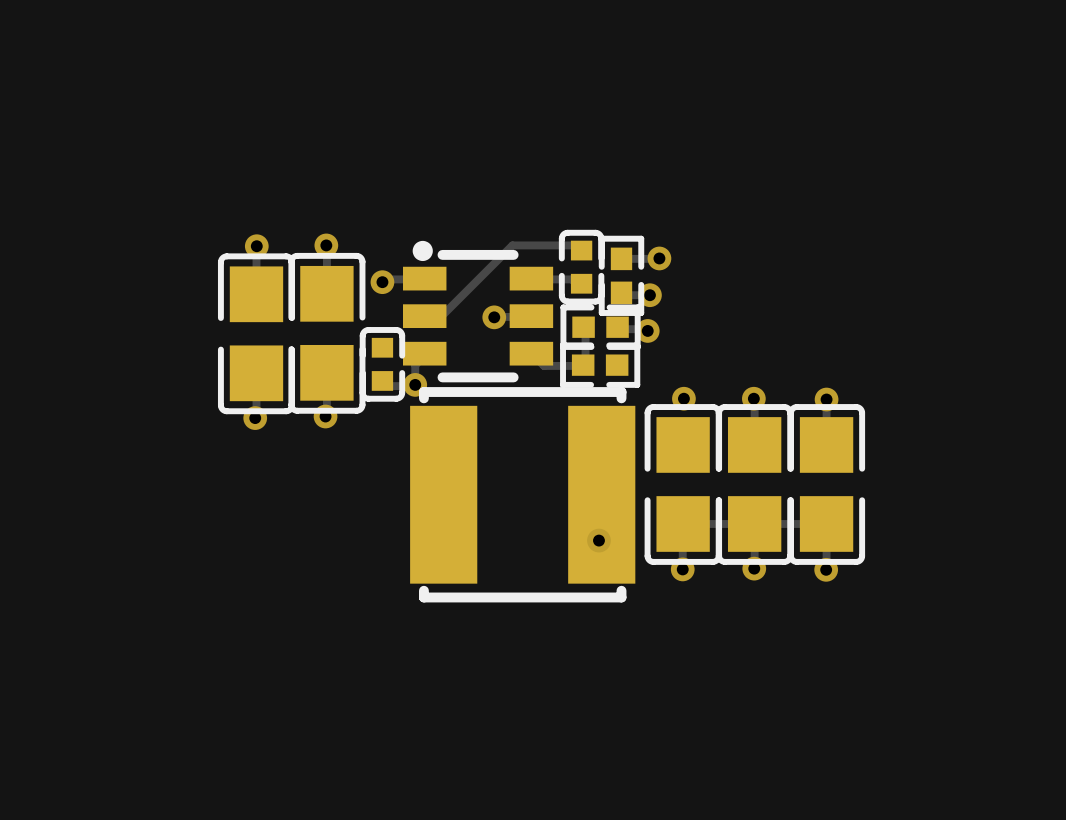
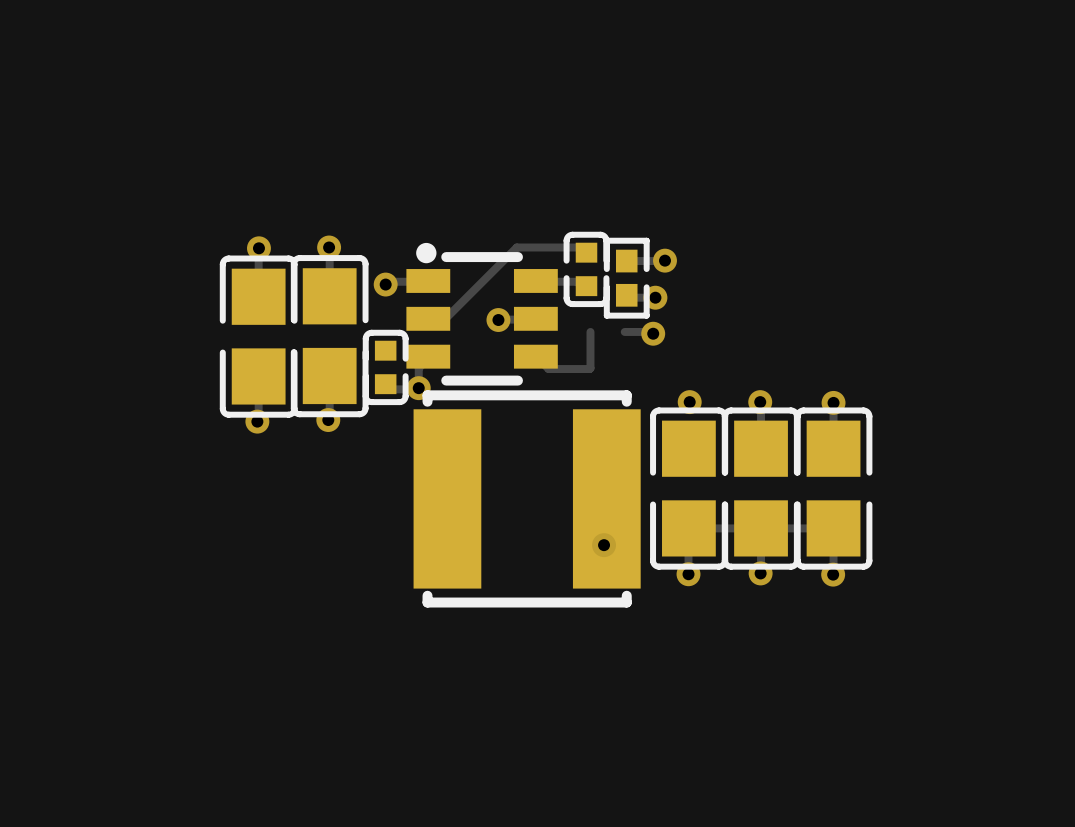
part: (600, 327) -> none
part: (600, 365) -> none

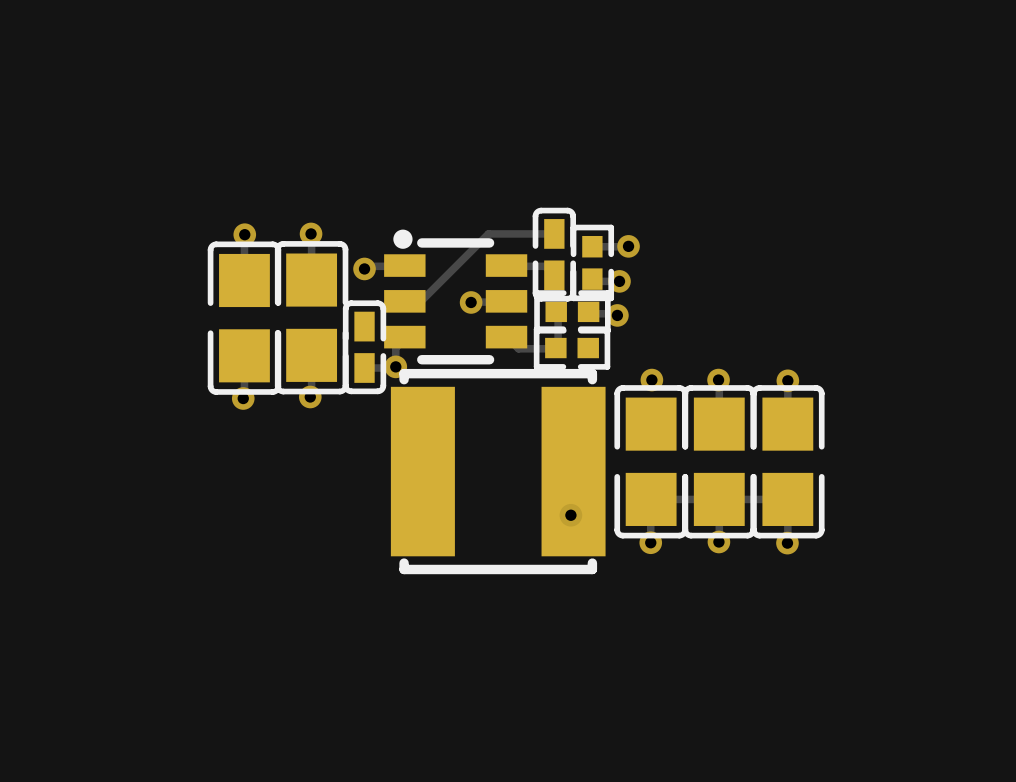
part footprint: [563, 231, 610, 308] -> [532, 207, 577, 302]
part footprint: [362, 329, 409, 406] -> [342, 300, 387, 395]
part: none -> (572, 311)
part: none -> (572, 348)

